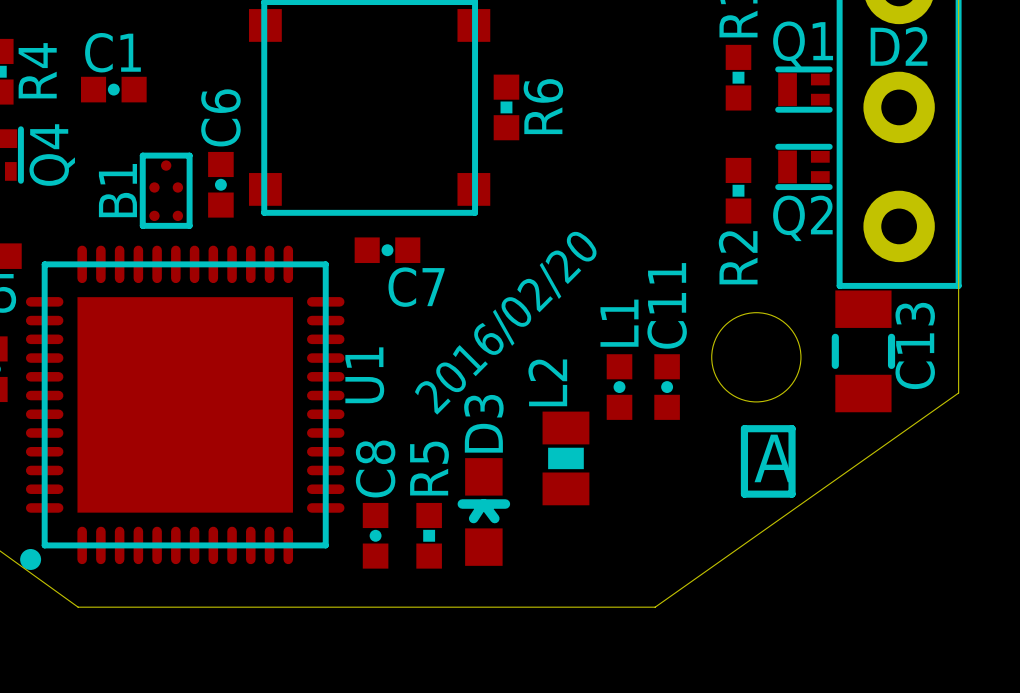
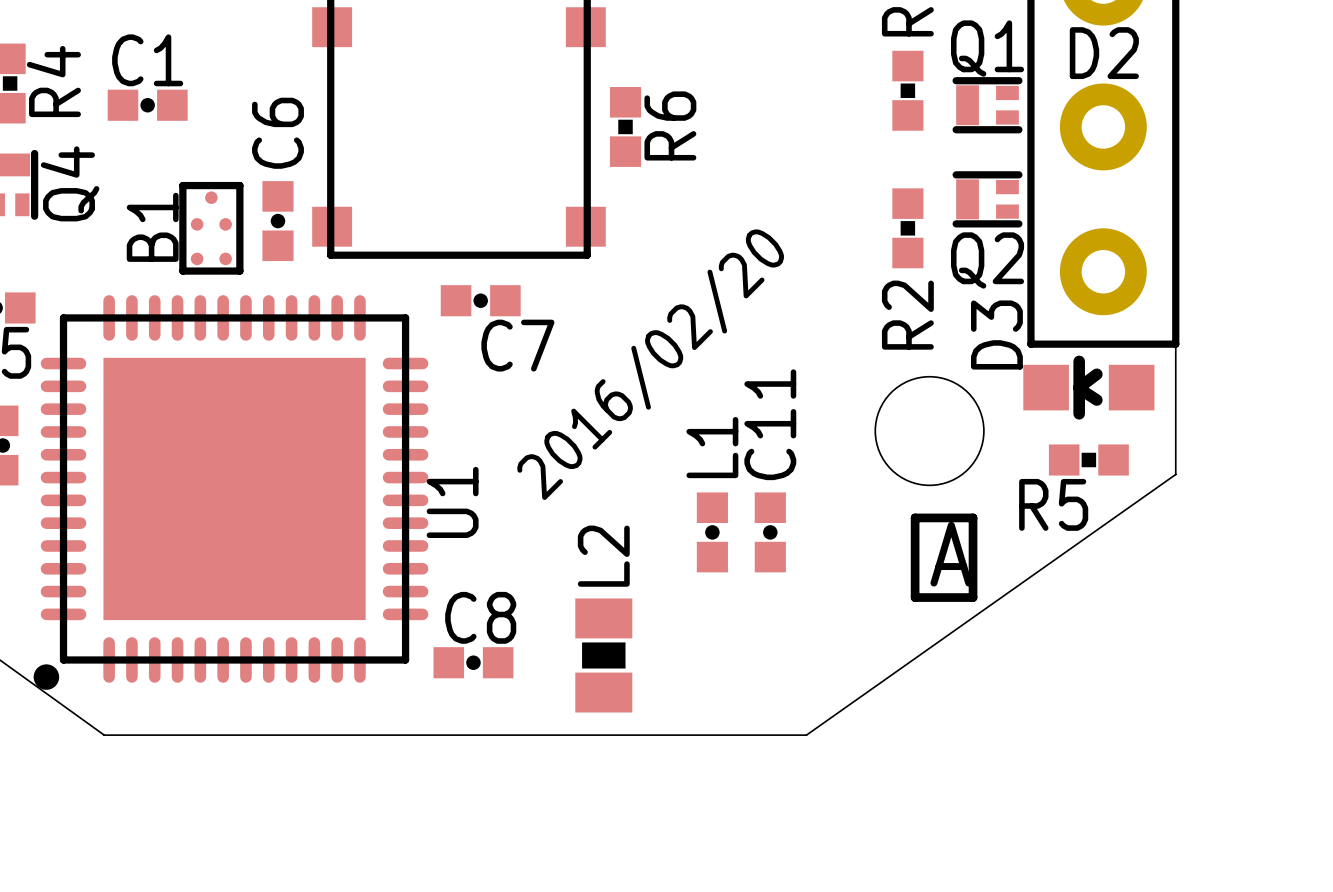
C13: (863, 351) -> none
U1 name position: U1 (364, 375) -> U1 (452, 502)
L2 name position: L2 (547, 382) -> L2 (603, 556)
L1 position: (619, 387) -> (712, 532)
C11 position: (667, 387) -> (770, 532)
L2 position: (565, 458) -> (603, 655)
R5 name position: R5 (429, 468) -> R5 (1053, 504)
D3 rotation: 0° (483, 511) -> 90° counterclockwise (1088, 387)
D3 position: (483, 511) -> (1088, 387)
C8 rotation: 0° (375, 535) -> 90° clockwise (473, 662)
R5 rotation: 0° (429, 535) -> 90° clockwise (1088, 460)
R5 position: (429, 535) -> (1088, 460)

